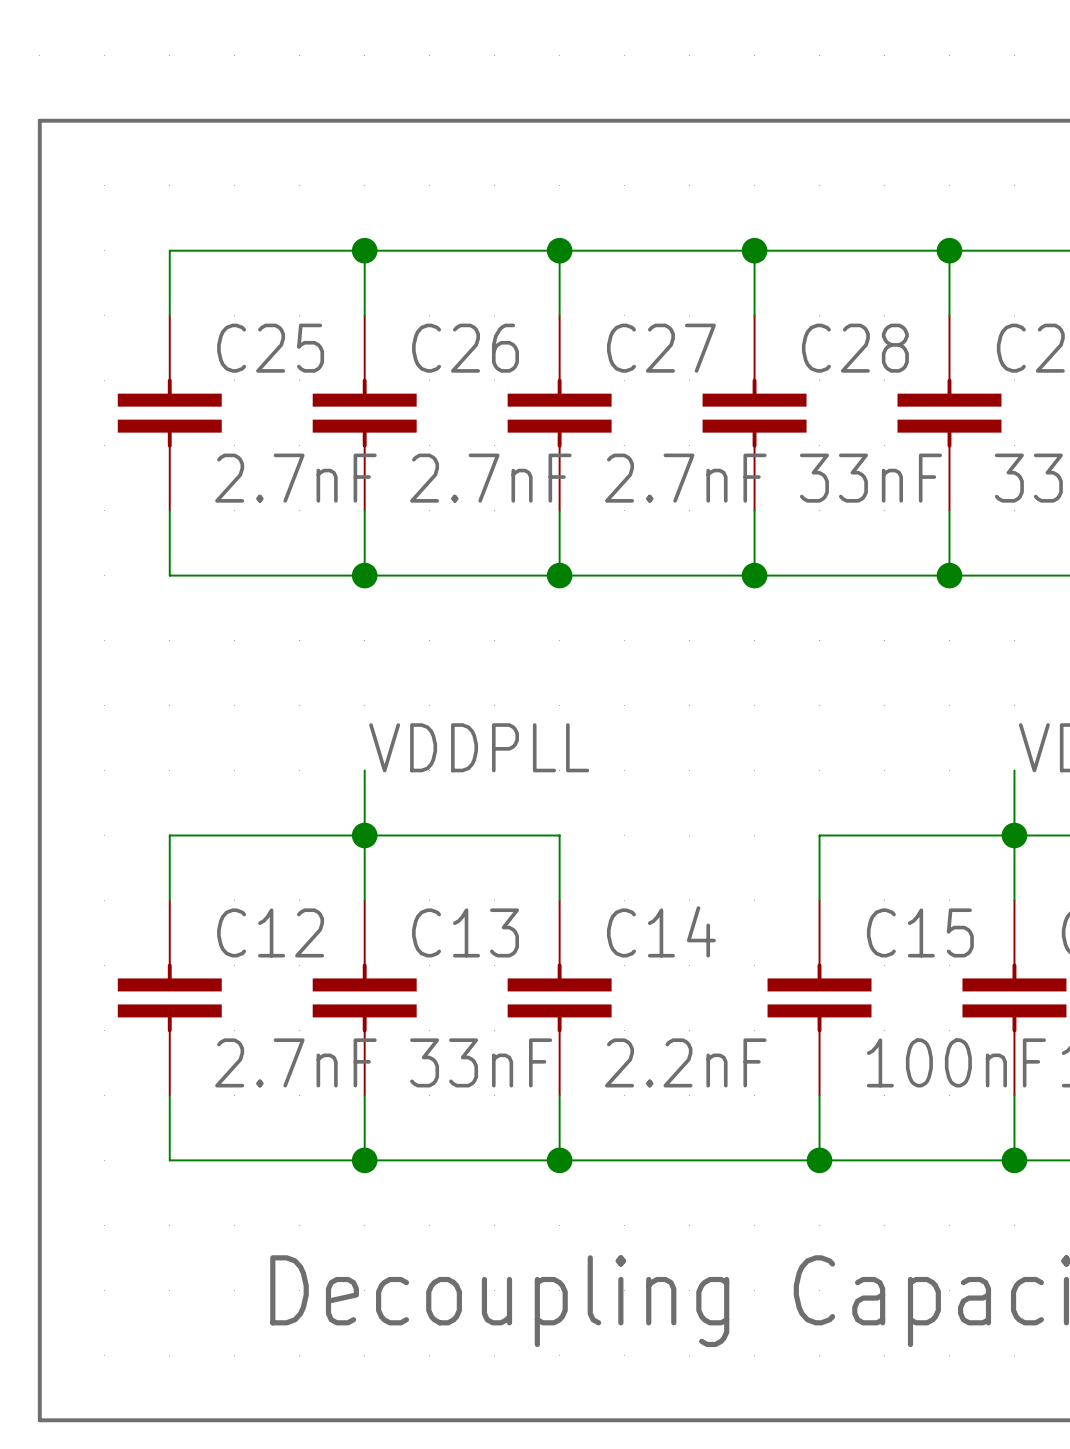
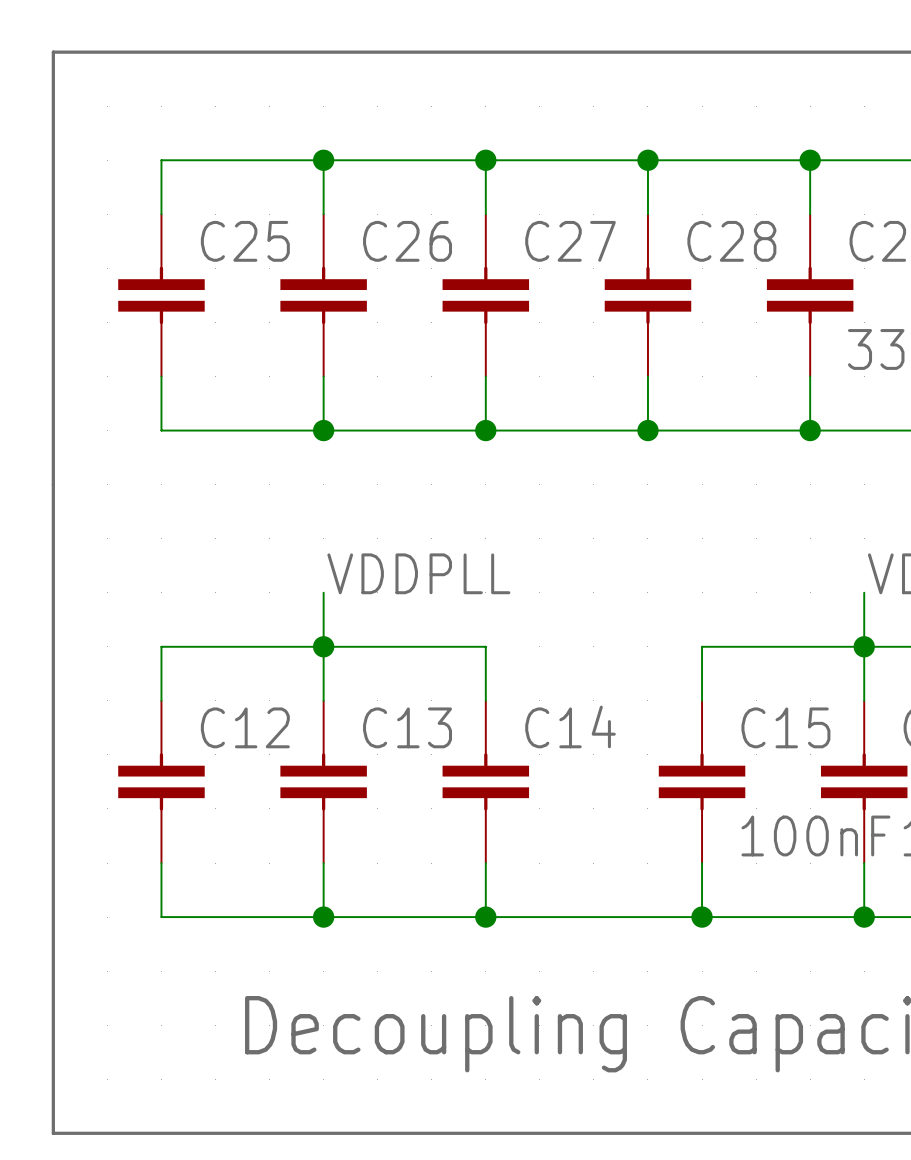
C25 value: 2.7nF (295, 478) -> none
C26 value: 2.7nF (490, 478) -> none
C27 value: 2.7nF (685, 478) -> none
C28 value: 33nF (870, 478) -> none
C12 value: 2.7nF (295, 1062) -> none
C13 value: 33nF (481, 1062) -> none
C14 value: 2.2nF (685, 1062) -> none

